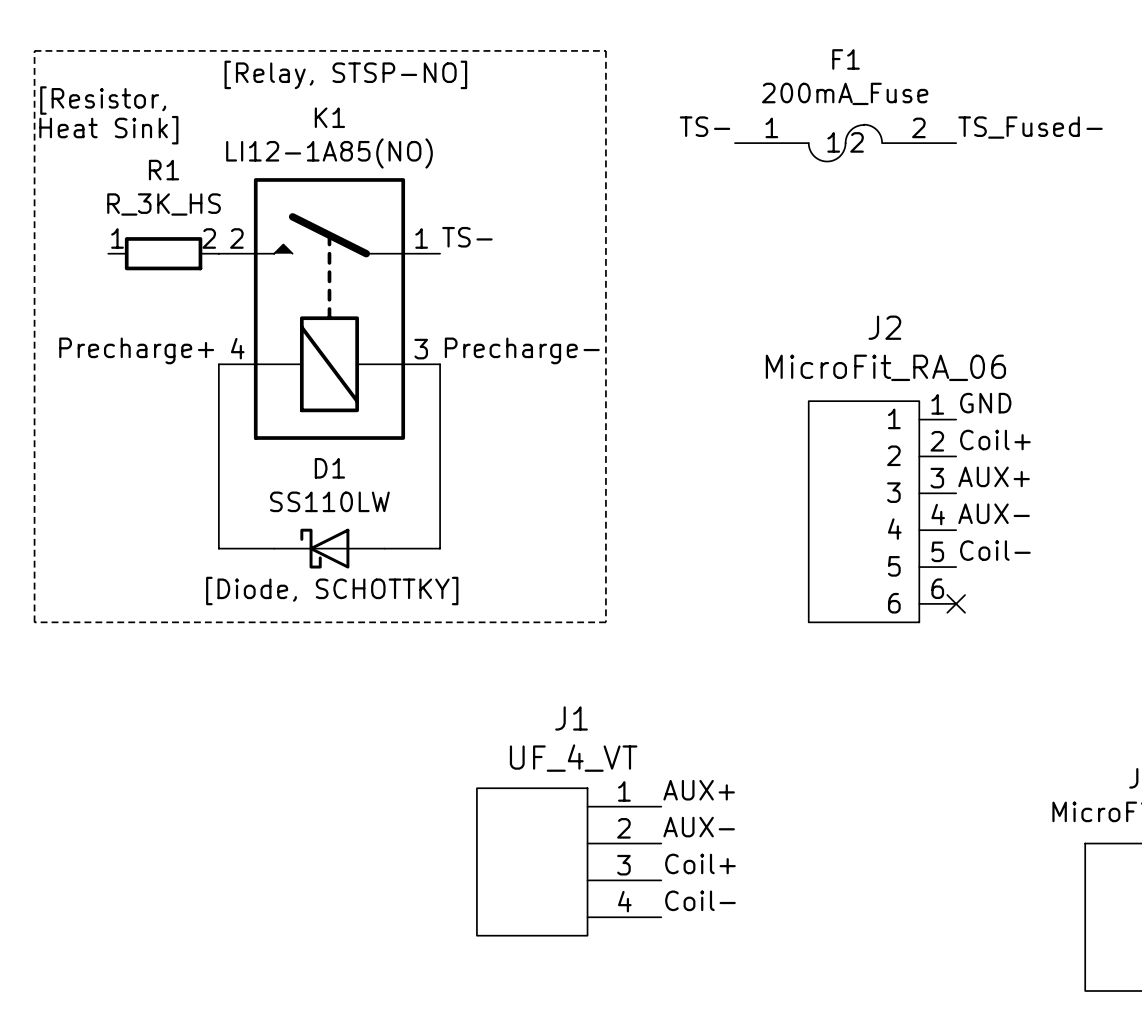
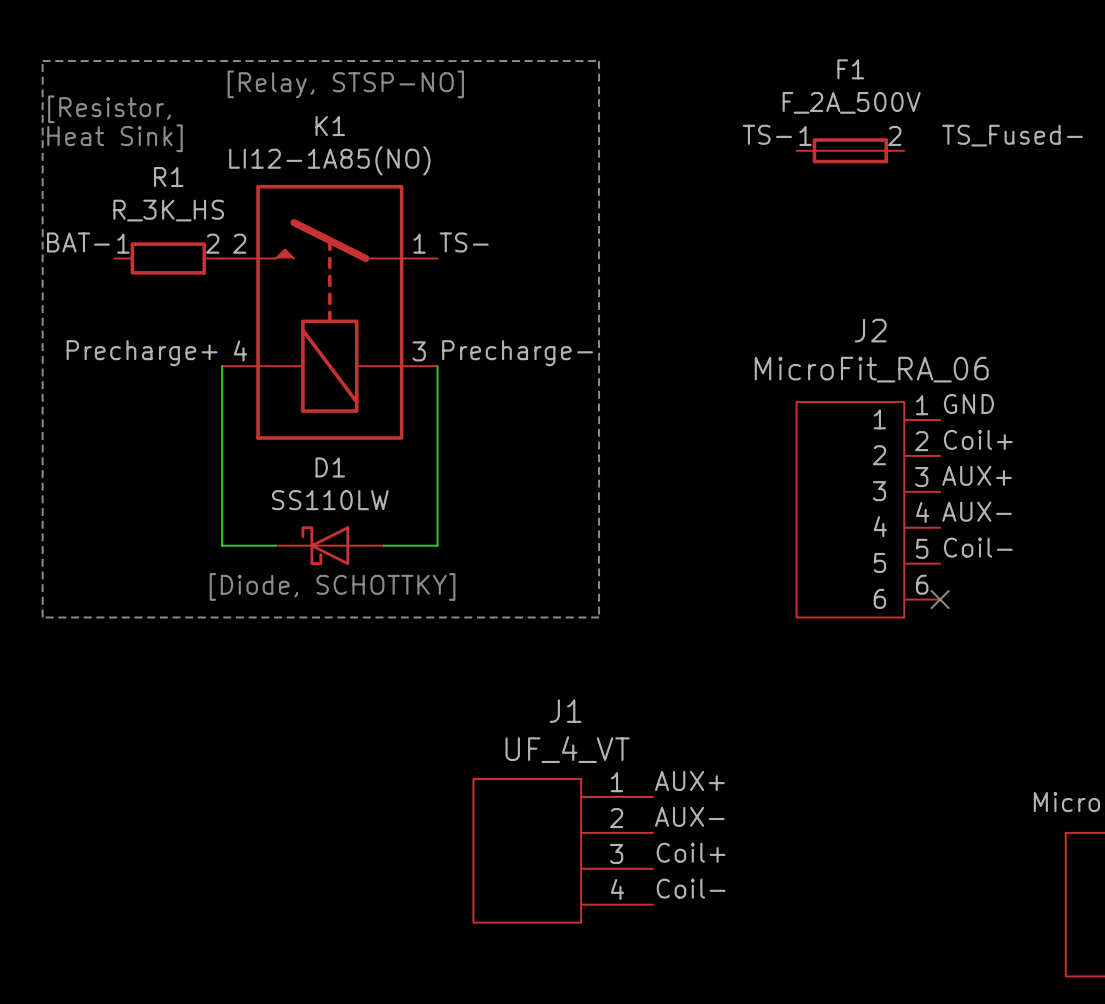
F1 value: 200mA_Fuse (845, 93) -> F_2A_500V (851, 102)
F1 symbol: [734, 124, 957, 162] -> [796, 138, 905, 164]
label position: TS- (705, 126) -> TS- (767, 134)
label: none -> BAT- (78, 242)

